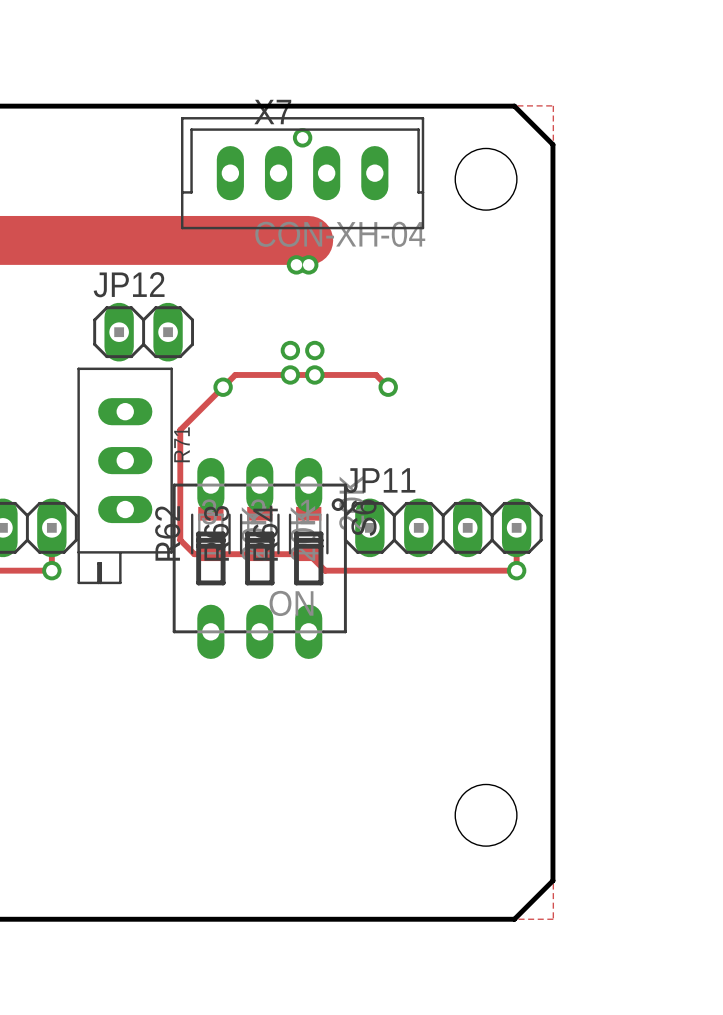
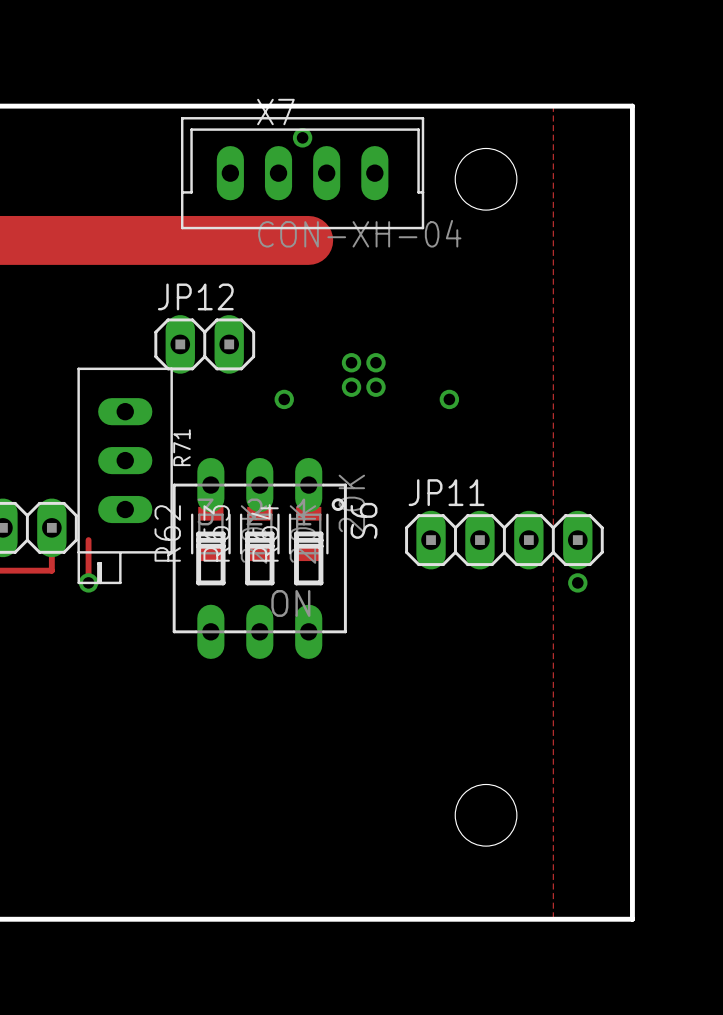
board edge: (514, 106) (552, 144) (552, 880) (514, 919) -> (514, 106) (632, 106) (632, 919) (514, 919)
via: (296, 264) -> none
via: (308, 264) -> none
JP12 position: (143, 332) -> (204, 344)
via: (290, 350) -> none
via: (314, 350) -> none
via: none -> (351, 362)
via: none -> (375, 362)
via: (290, 374) -> none
via: (314, 374) -> none
via: (223, 387) -> none
via: none -> (351, 387)
track: (388, 387) (375, 374) (235, 374) (180, 430) (180, 540) (194, 554) (308, 554) (325, 570) (516, 570) (516, 527) -> none
via position: (388, 387) -> (375, 387)
via: none -> (284, 399)
via: none -> (449, 399)
JP11 position: (443, 527) -> (504, 540)
track: none -> (88, 540) (88, 582)
via position: (51, 570) -> (88, 582)
via position: (516, 570) -> (577, 582)

